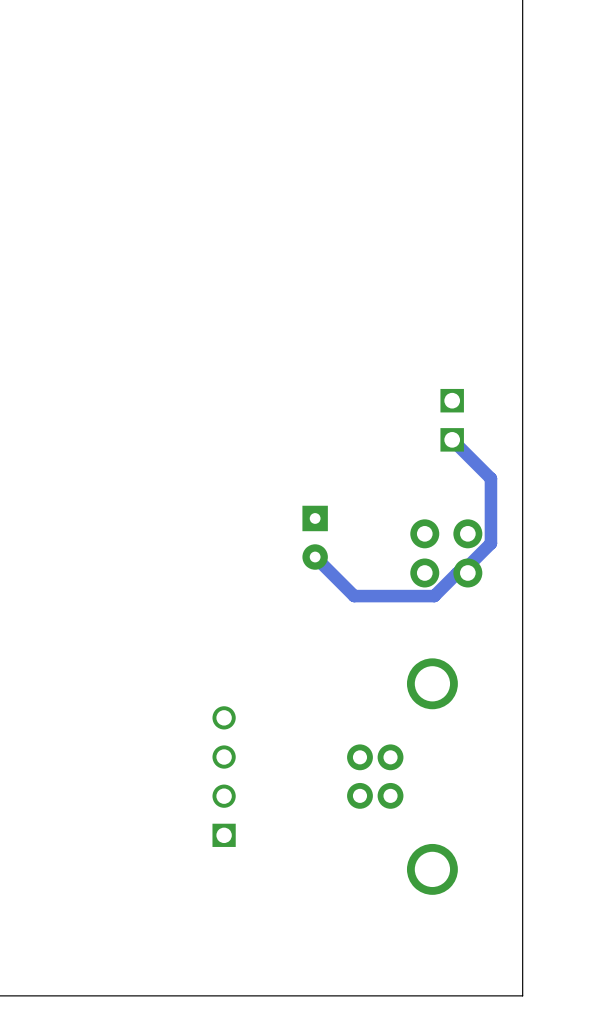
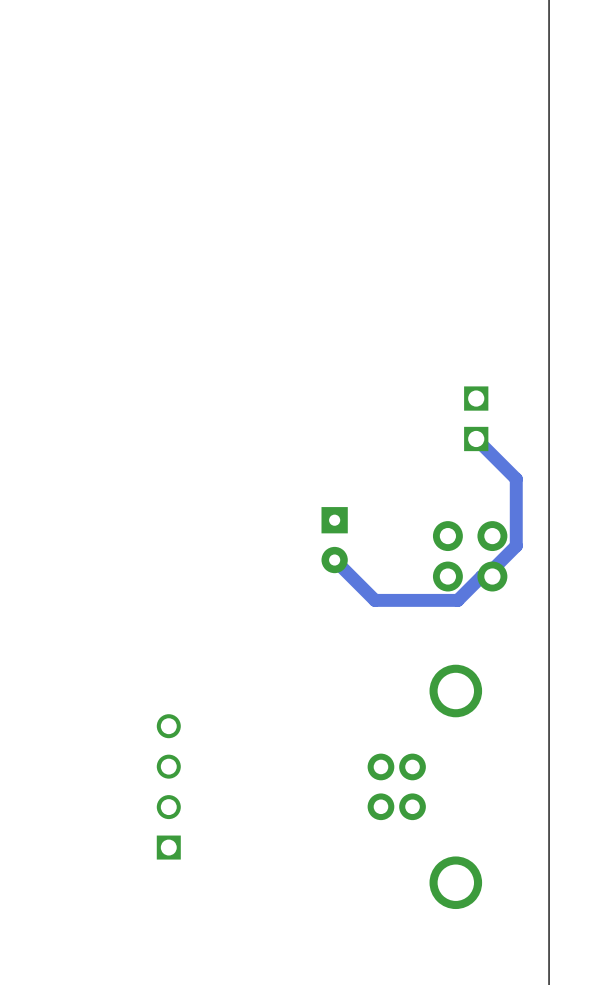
part position: (224, 776) -> (168, 786)

